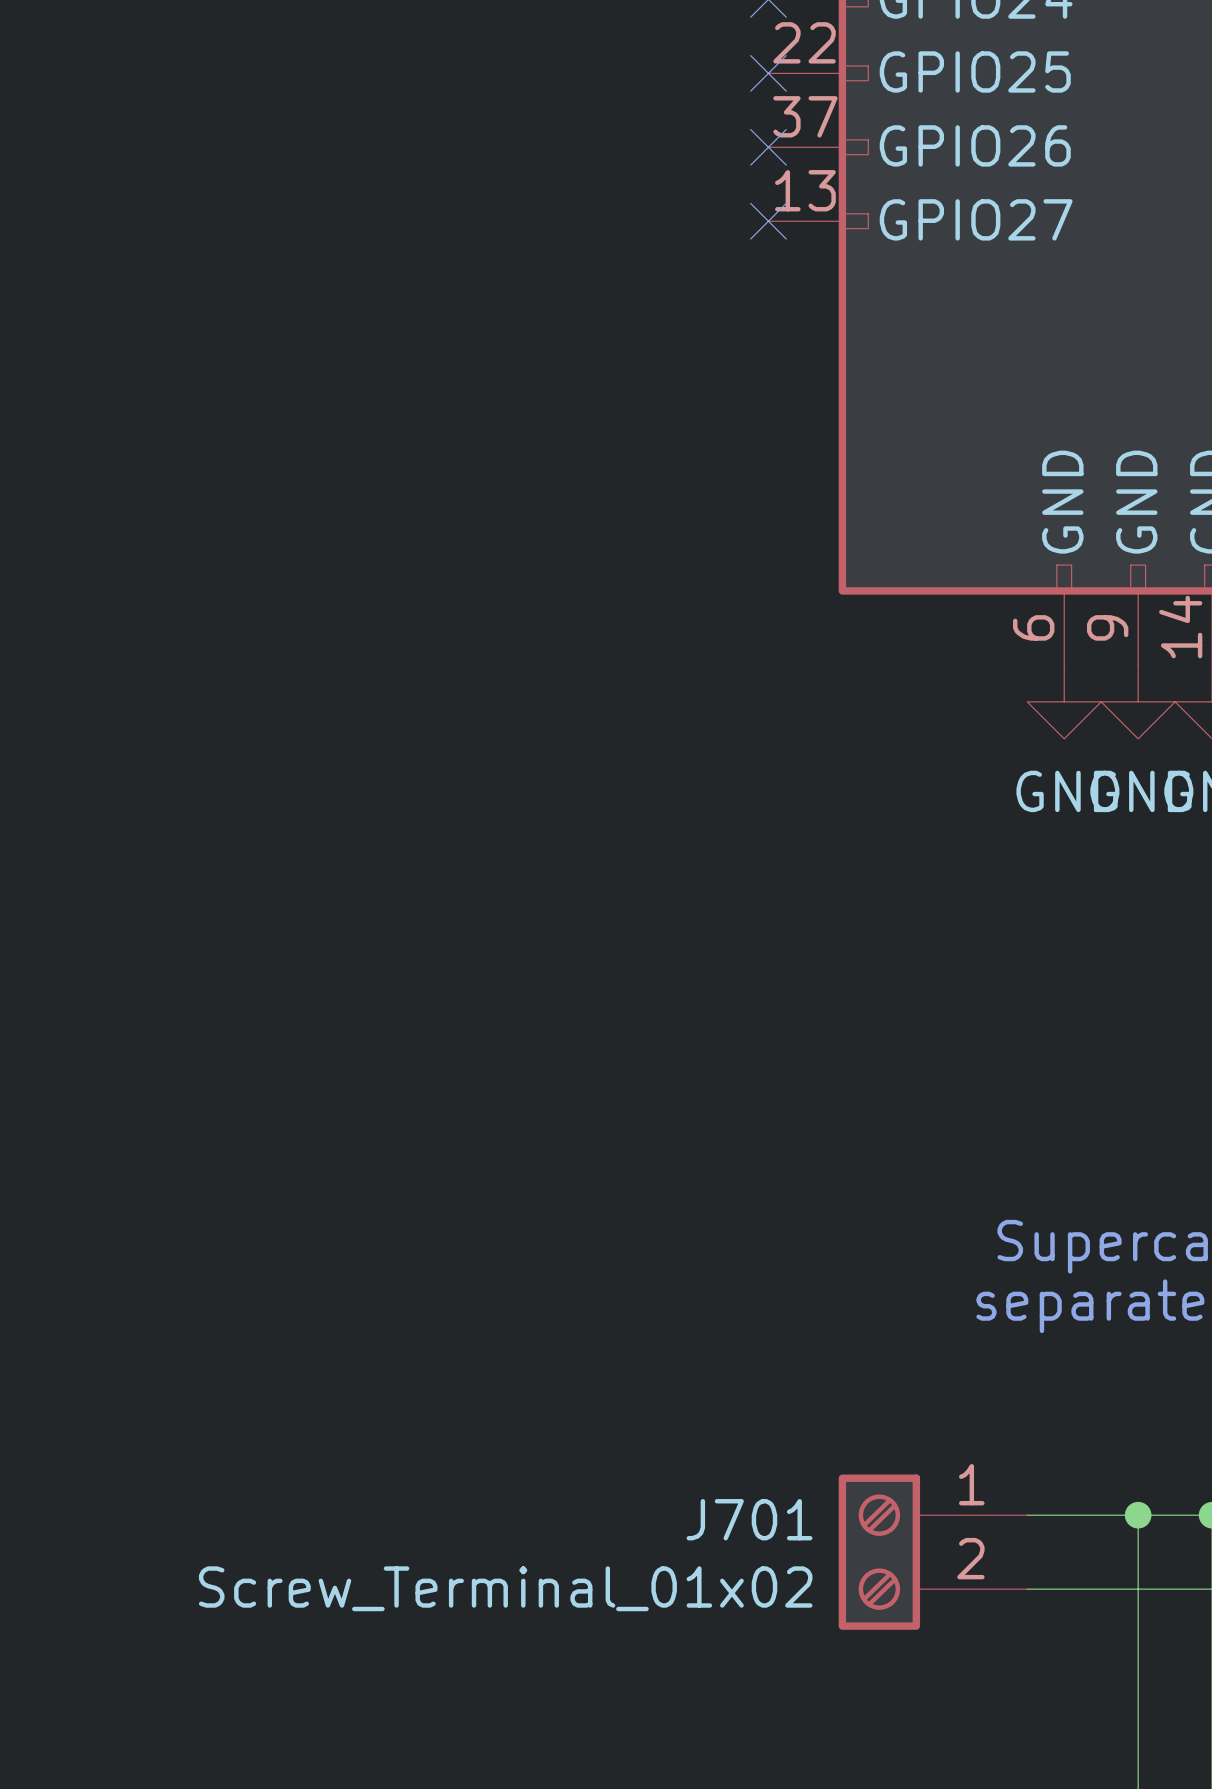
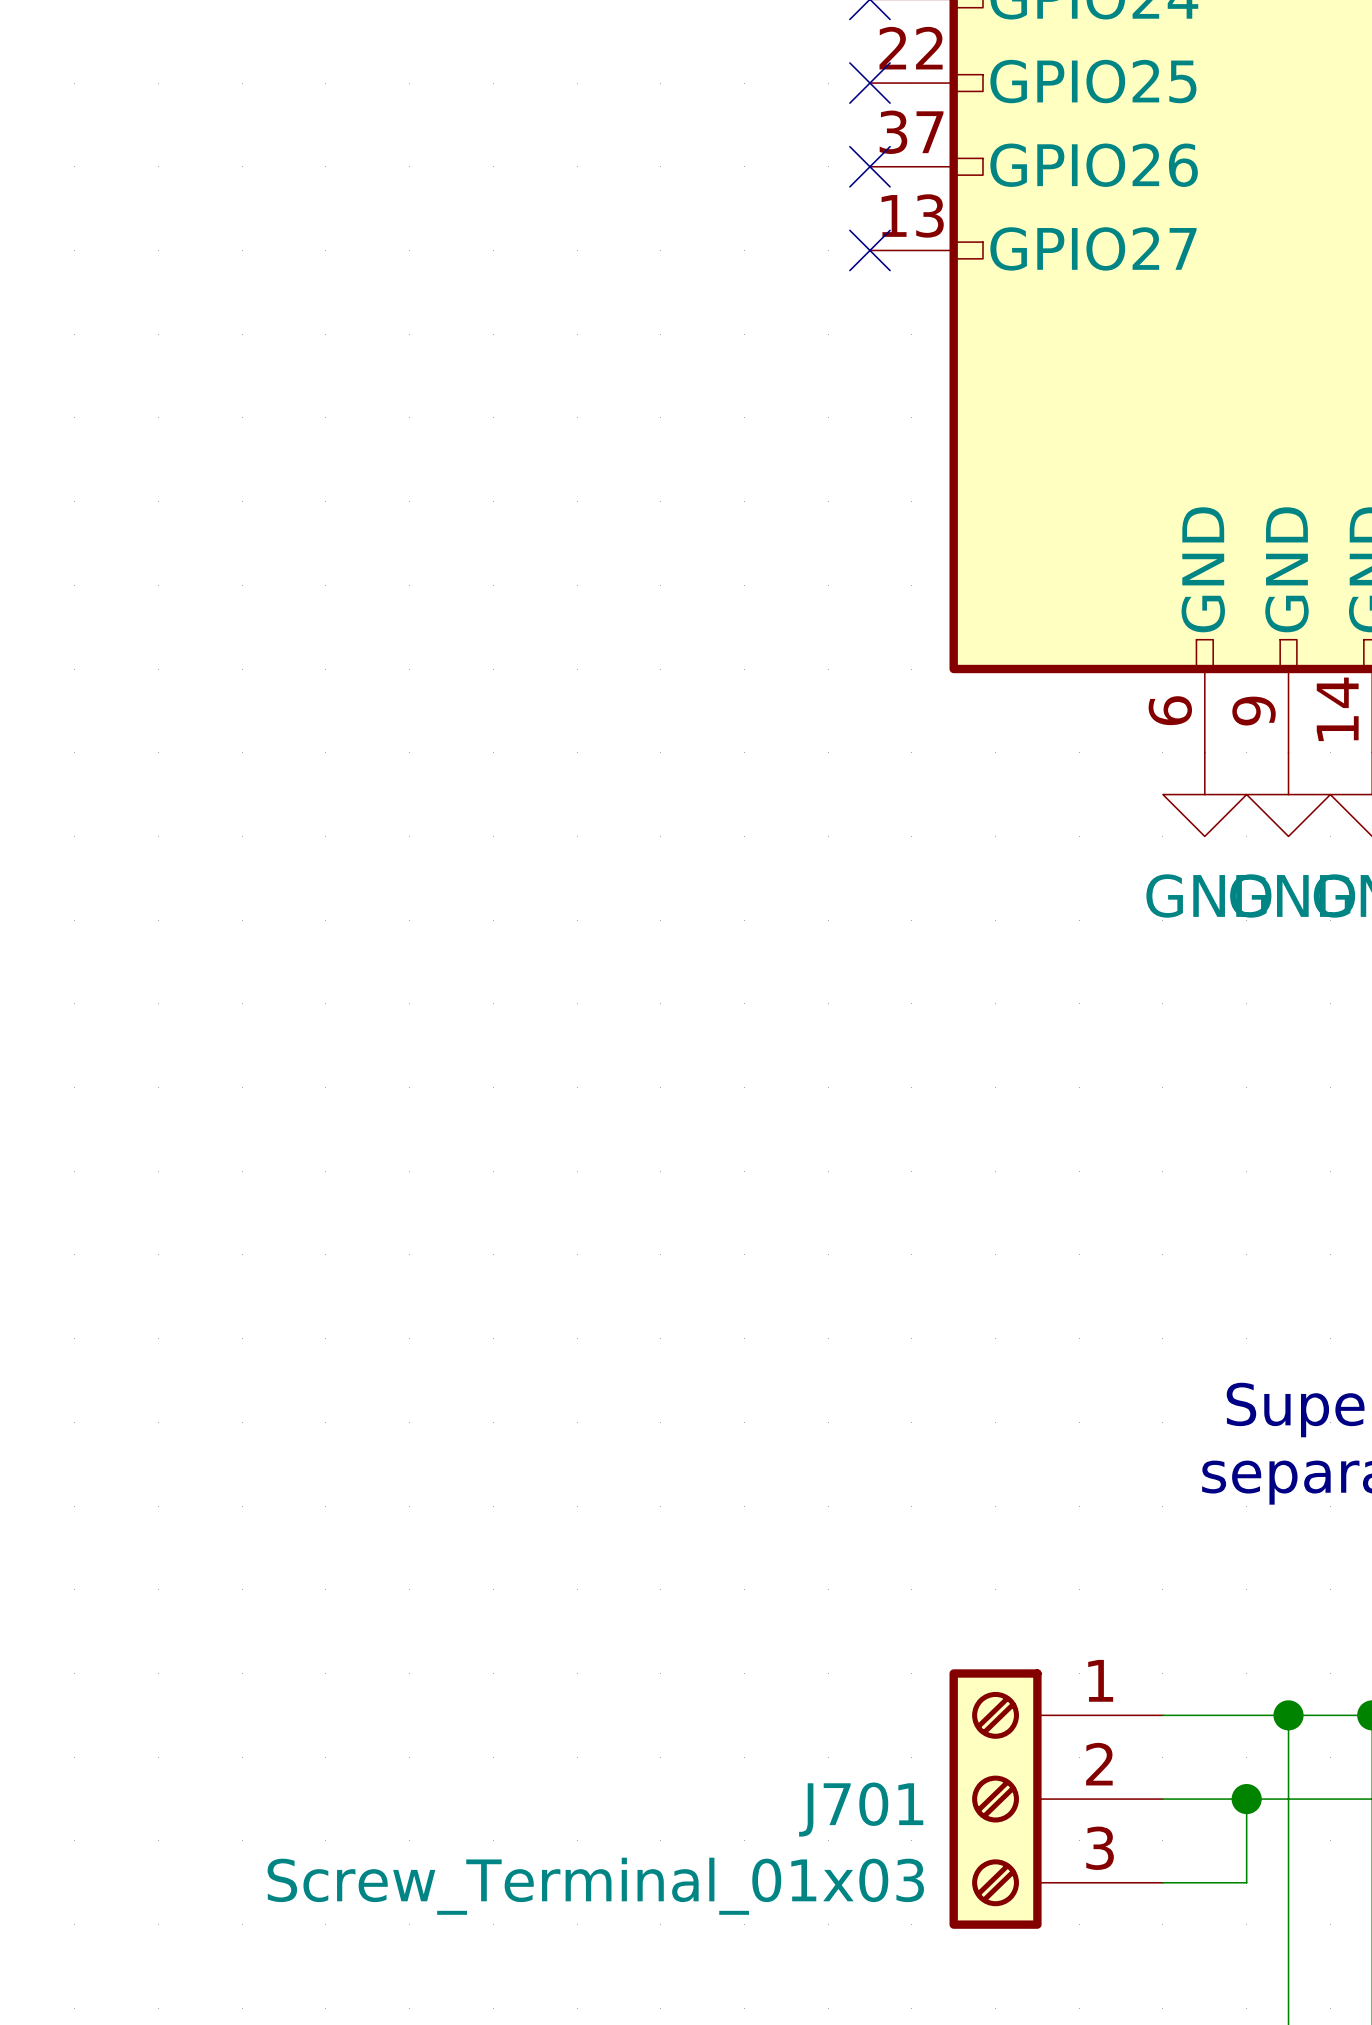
J701 symbol: [838, 1474, 1028, 1630] -> [949, 1669, 1163, 1929]
J701 value: Screw_Terminal_01x02 (505, 1588) -> Screw_Terminal_01x03 (595, 1886)
wire: none -> (1246, 1799) (1246, 1882) (1162, 1882)
junction: none -> (1246, 1799)

